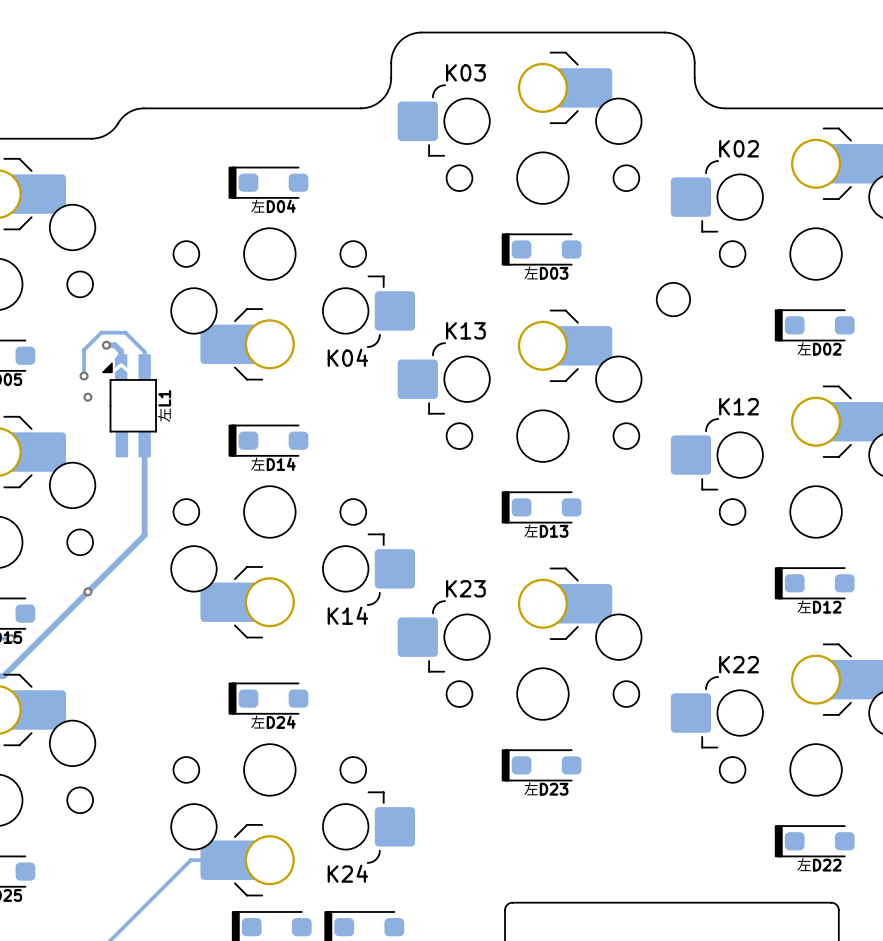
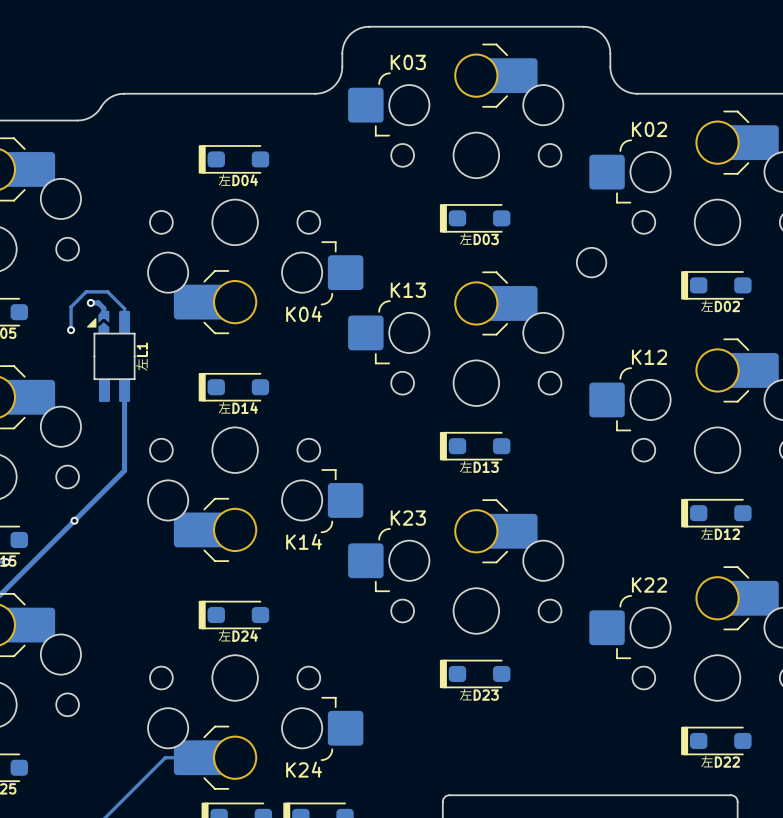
via: (87, 397) -> none

